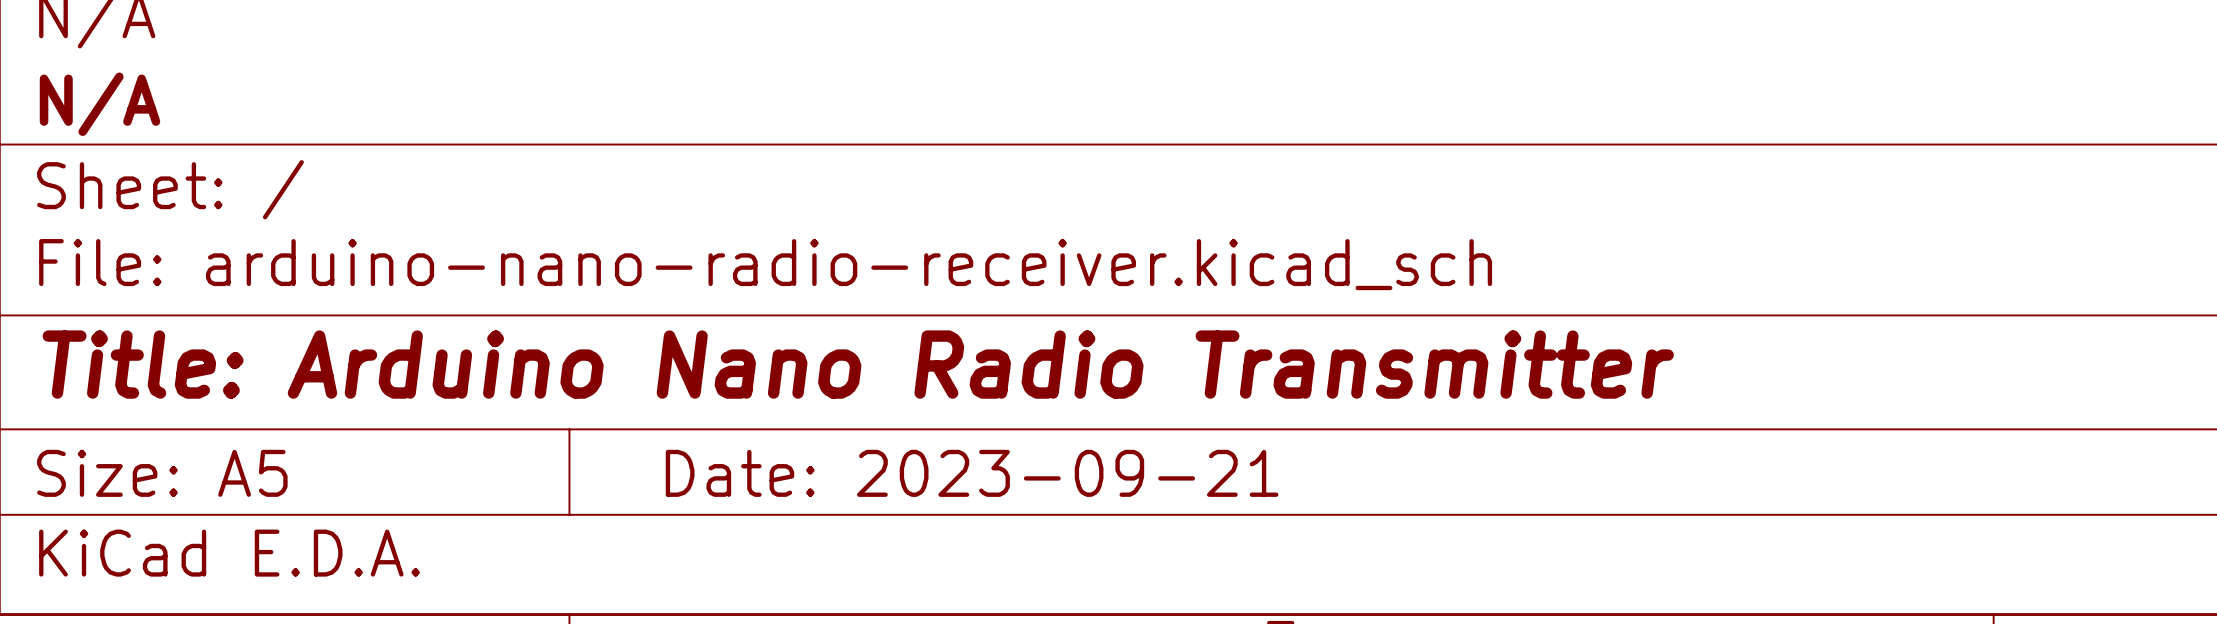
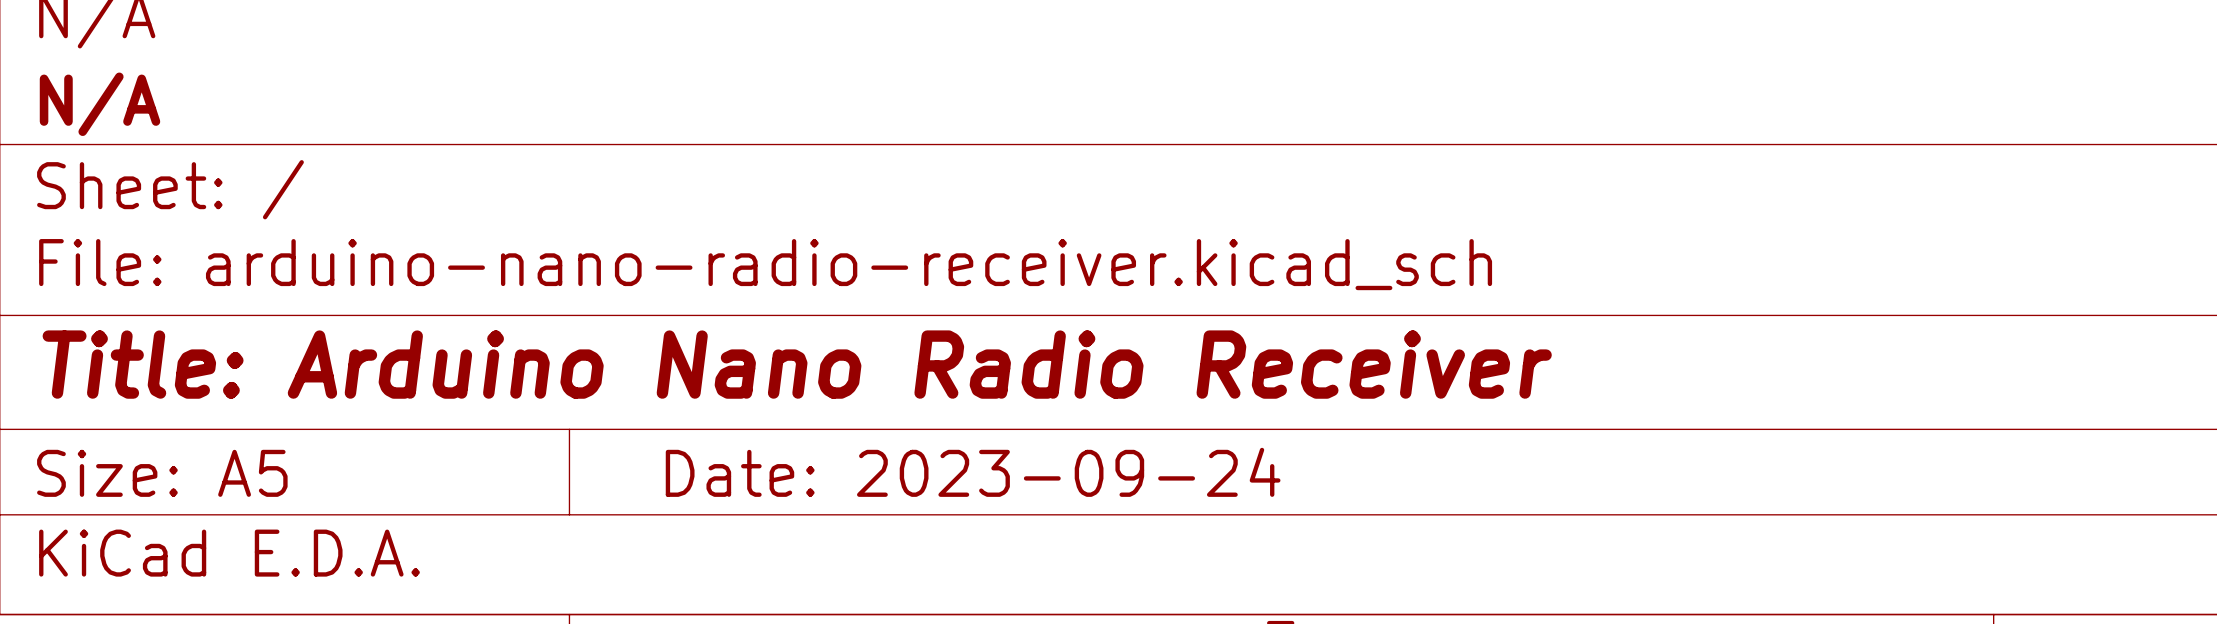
title block: Title: Arduino Nano Radio Transmitter (858, 364) -> Title: Arduino Nano Radio Receiver (797, 364)
title block: Date: 2023-09-21 (972, 473) -> Date: 2023-09-24 (973, 472)

